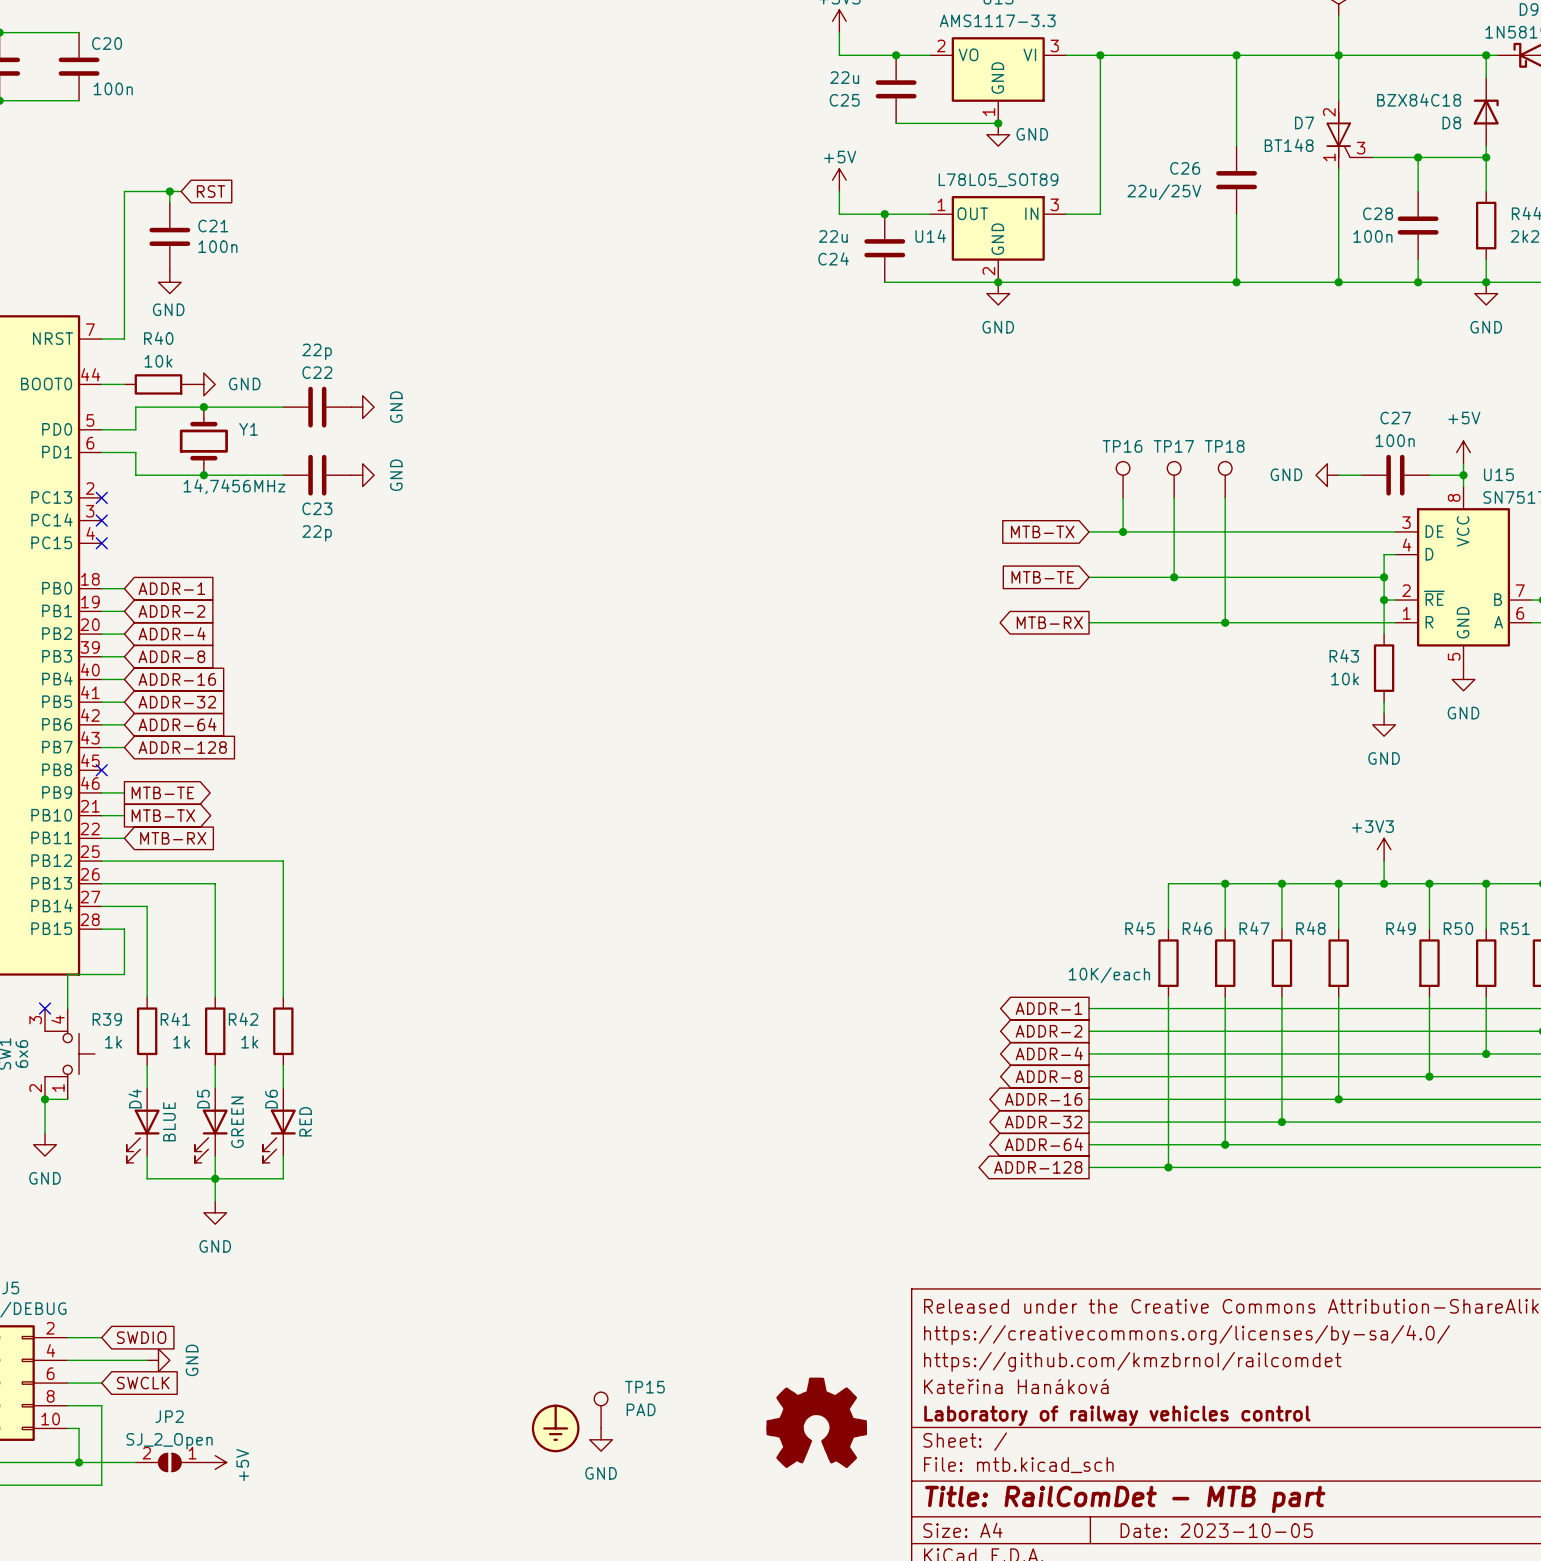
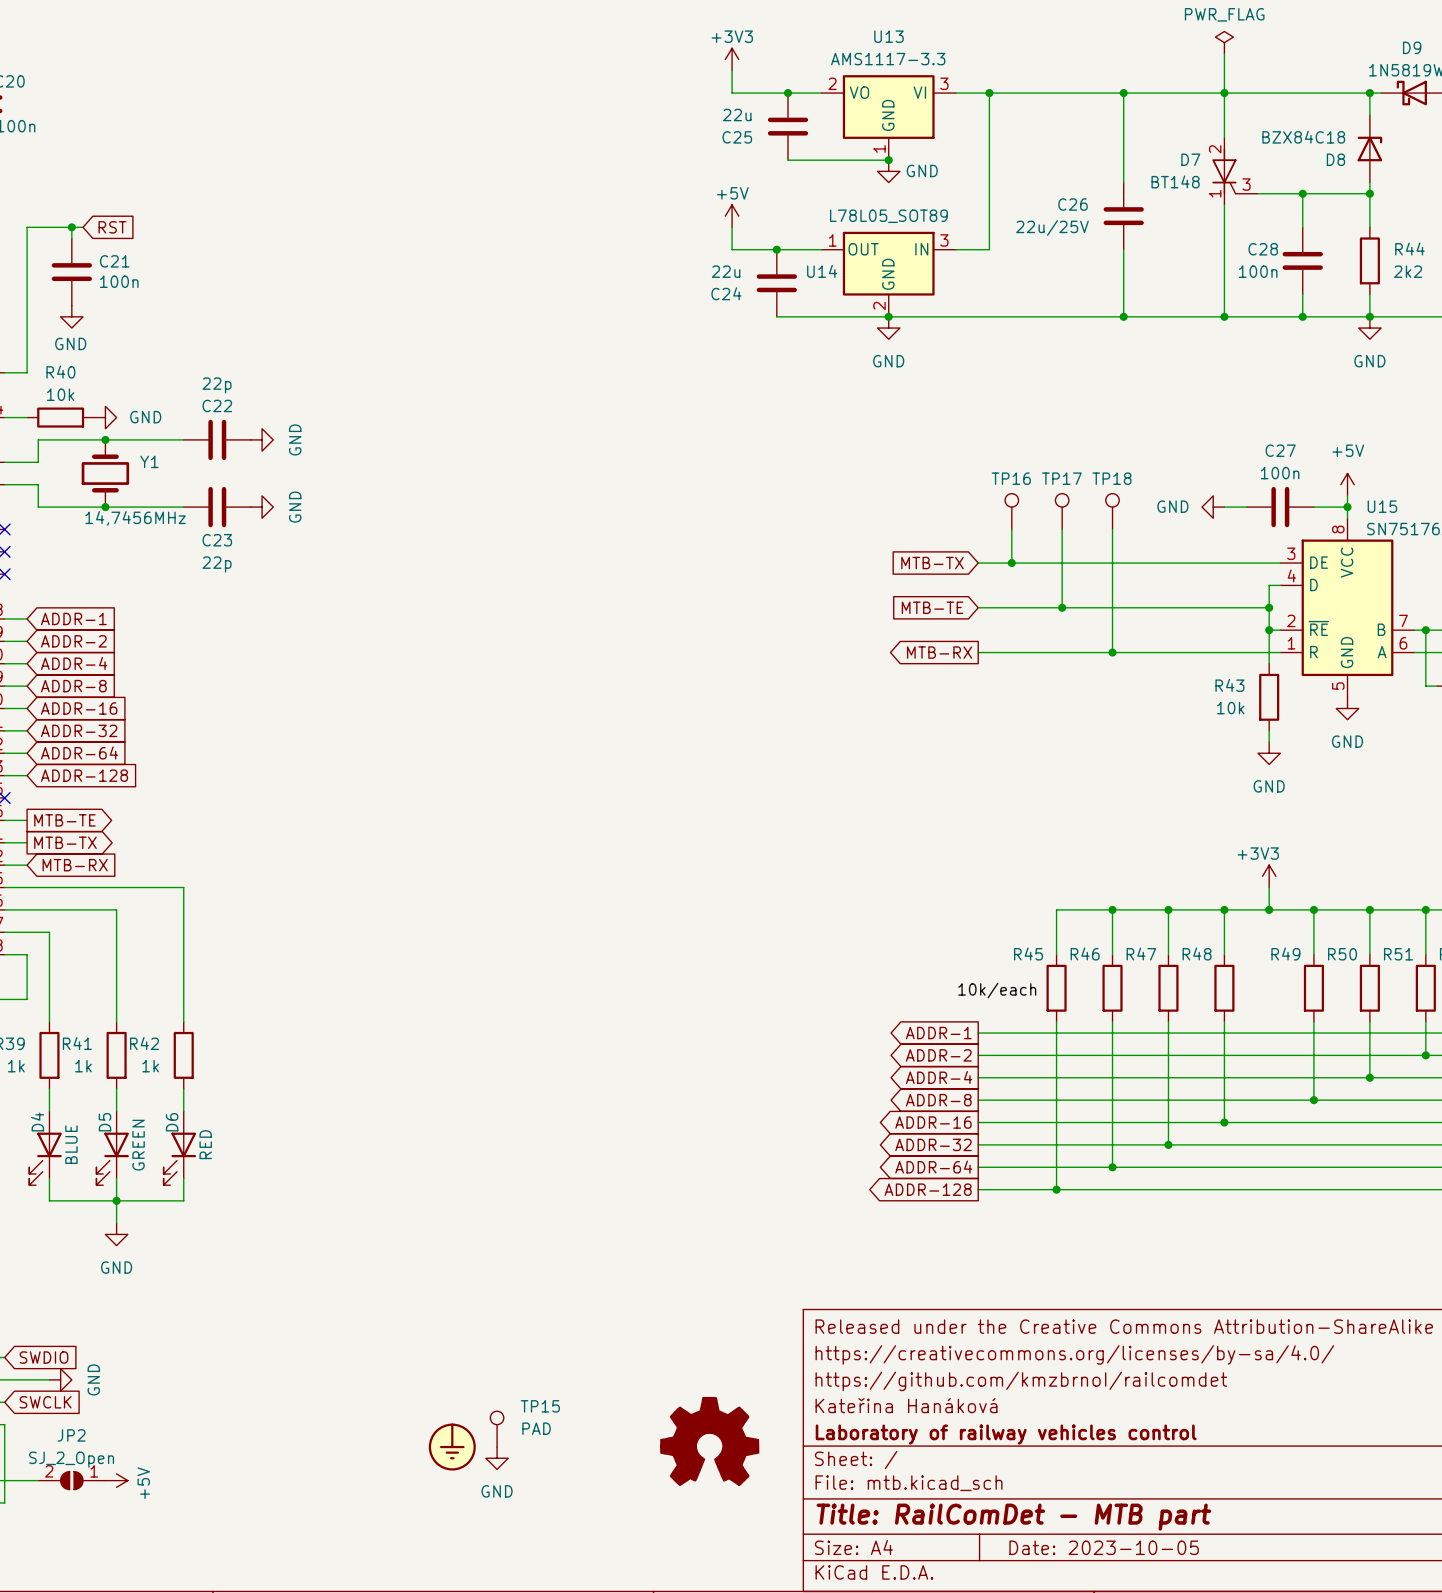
label: none -> 10k/each (997, 990)
R50 value: 10K/each (1109, 975) -> none

